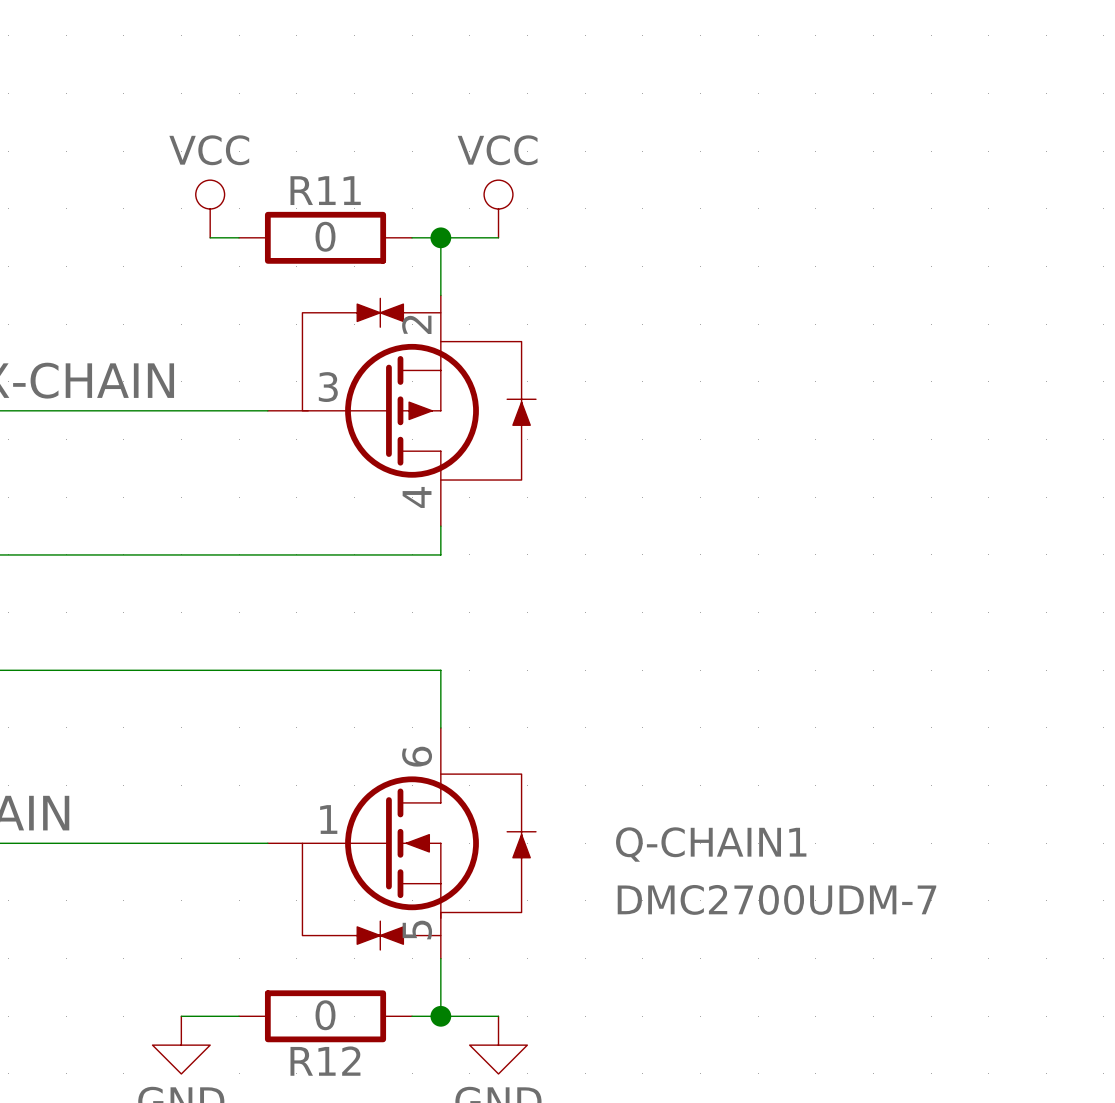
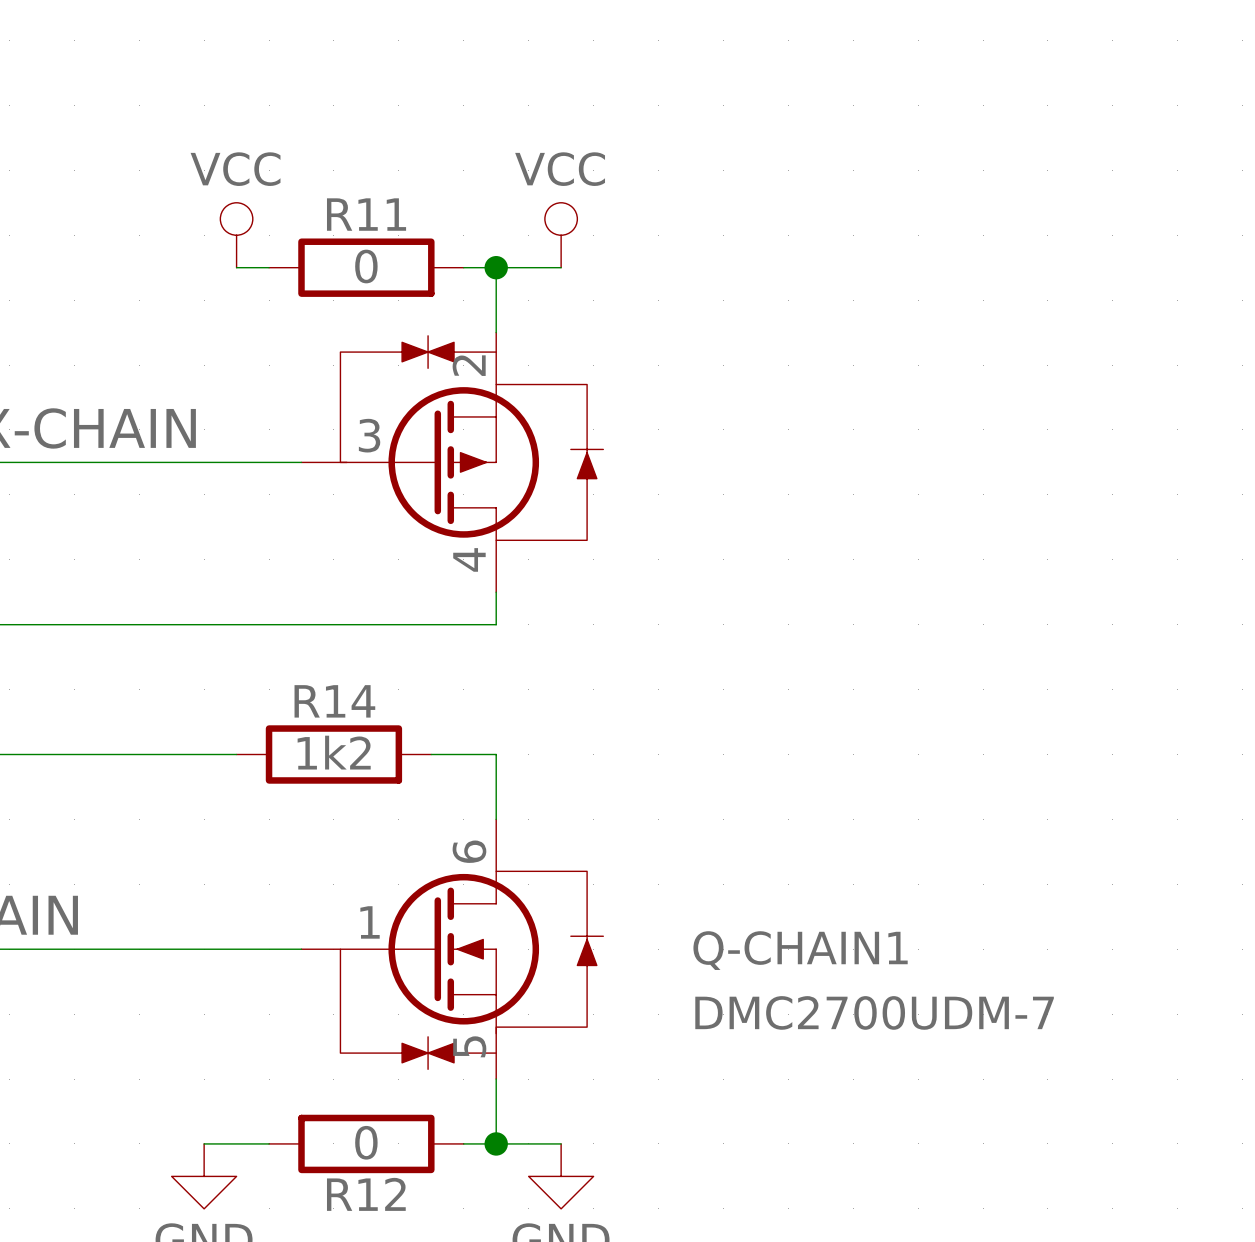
wire: (210, 670) (383, 670) -> none
R14: none -> 1k2 (333, 754)

